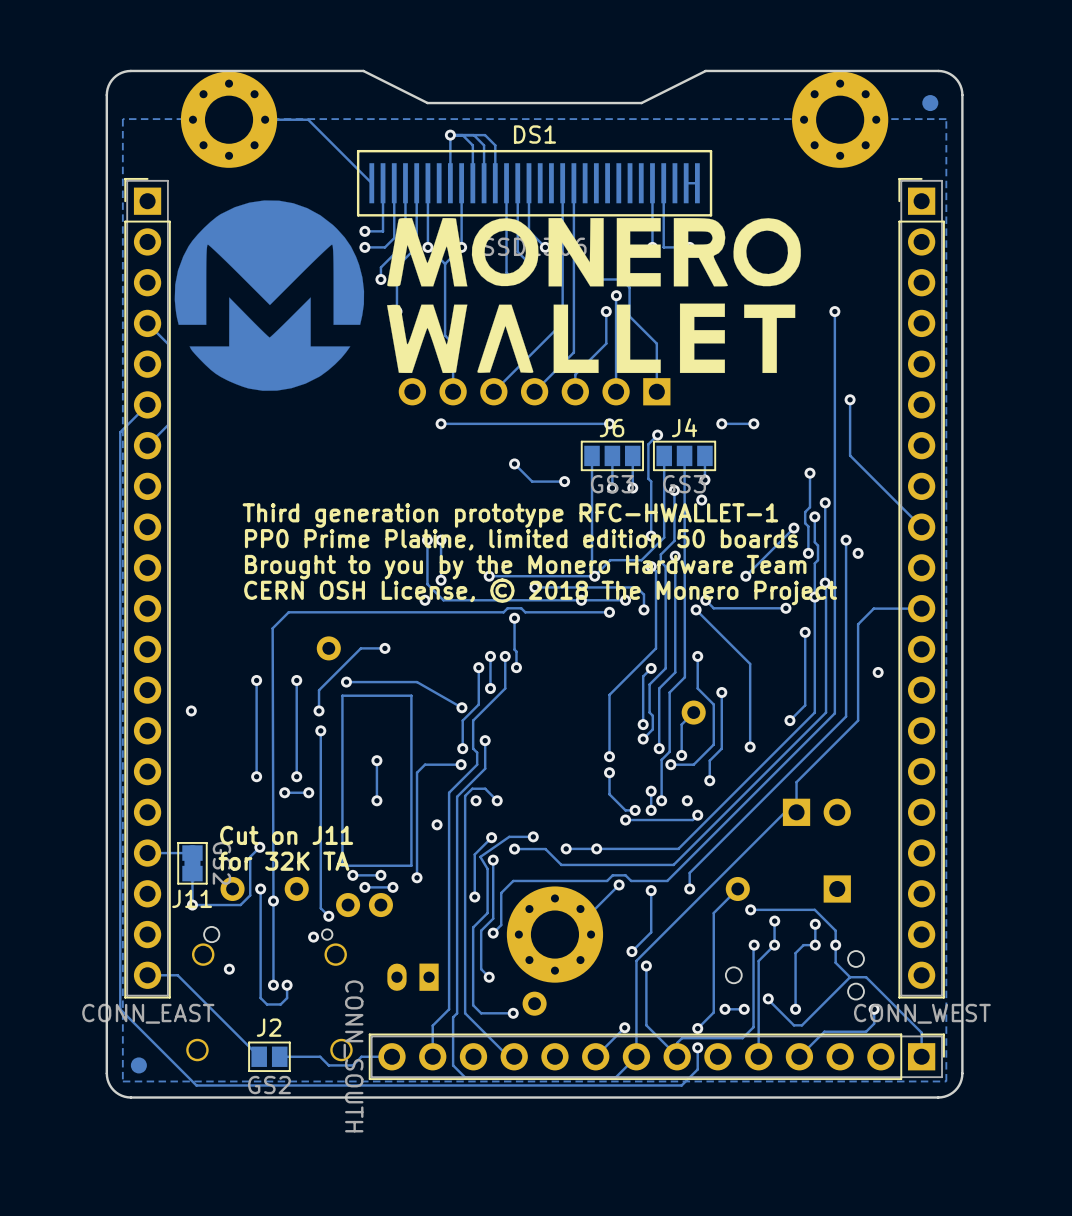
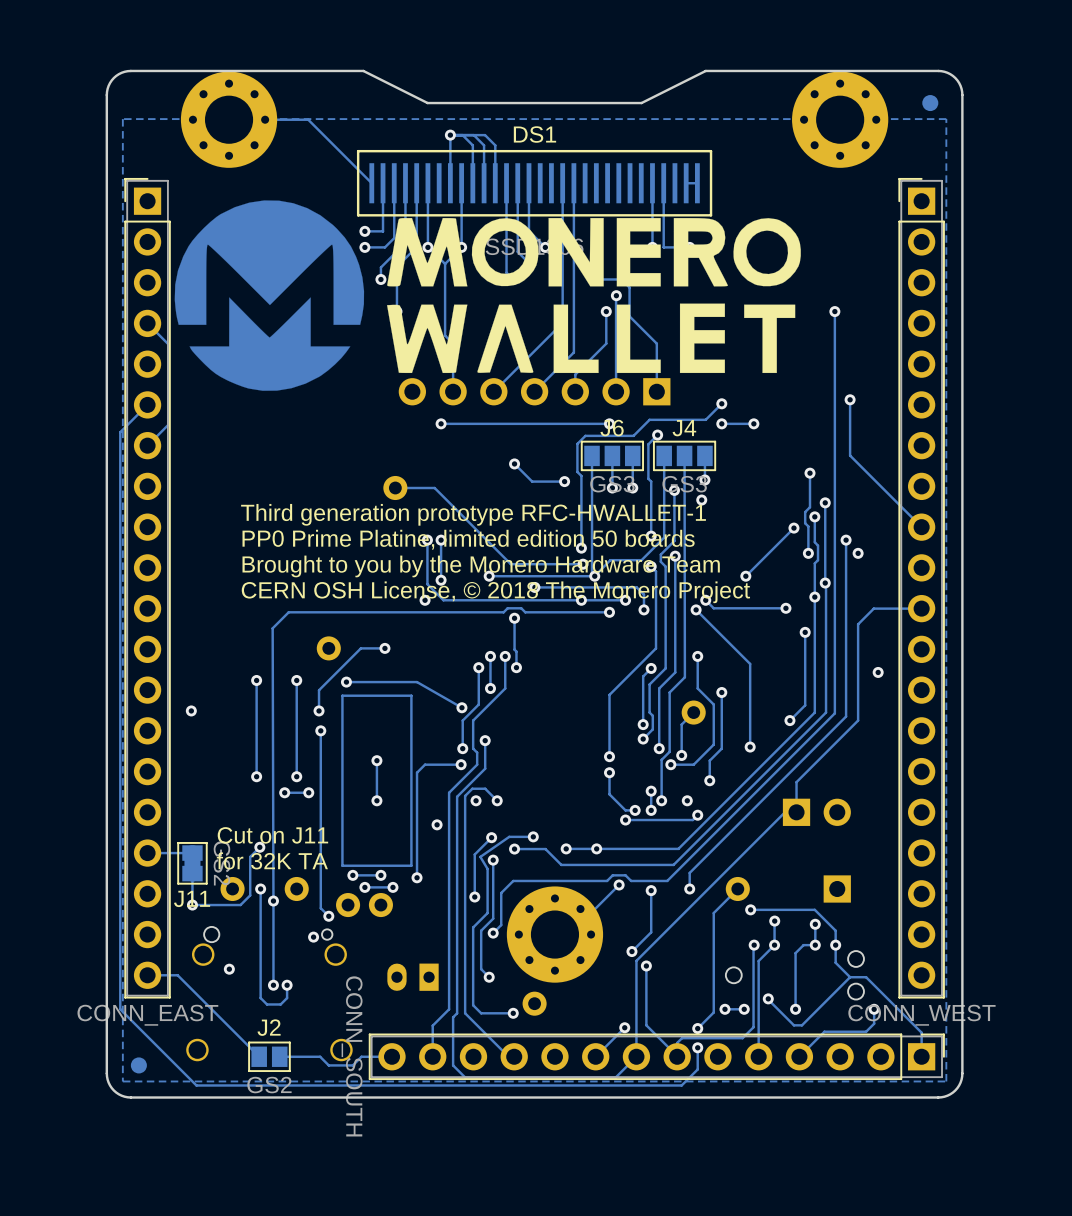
track: none -> (721, 403) (705, 419) (649, 419) (633, 435) (585, 435) (577, 443) (577, 471) (581, 475) (581, 548)
via: none -> (721, 403)
track: none -> (395, 488) (434, 488) (510, 564) (583, 564)
part: none -> (395, 488)
via: none -> (581, 548)
via: none -> (583, 564)

